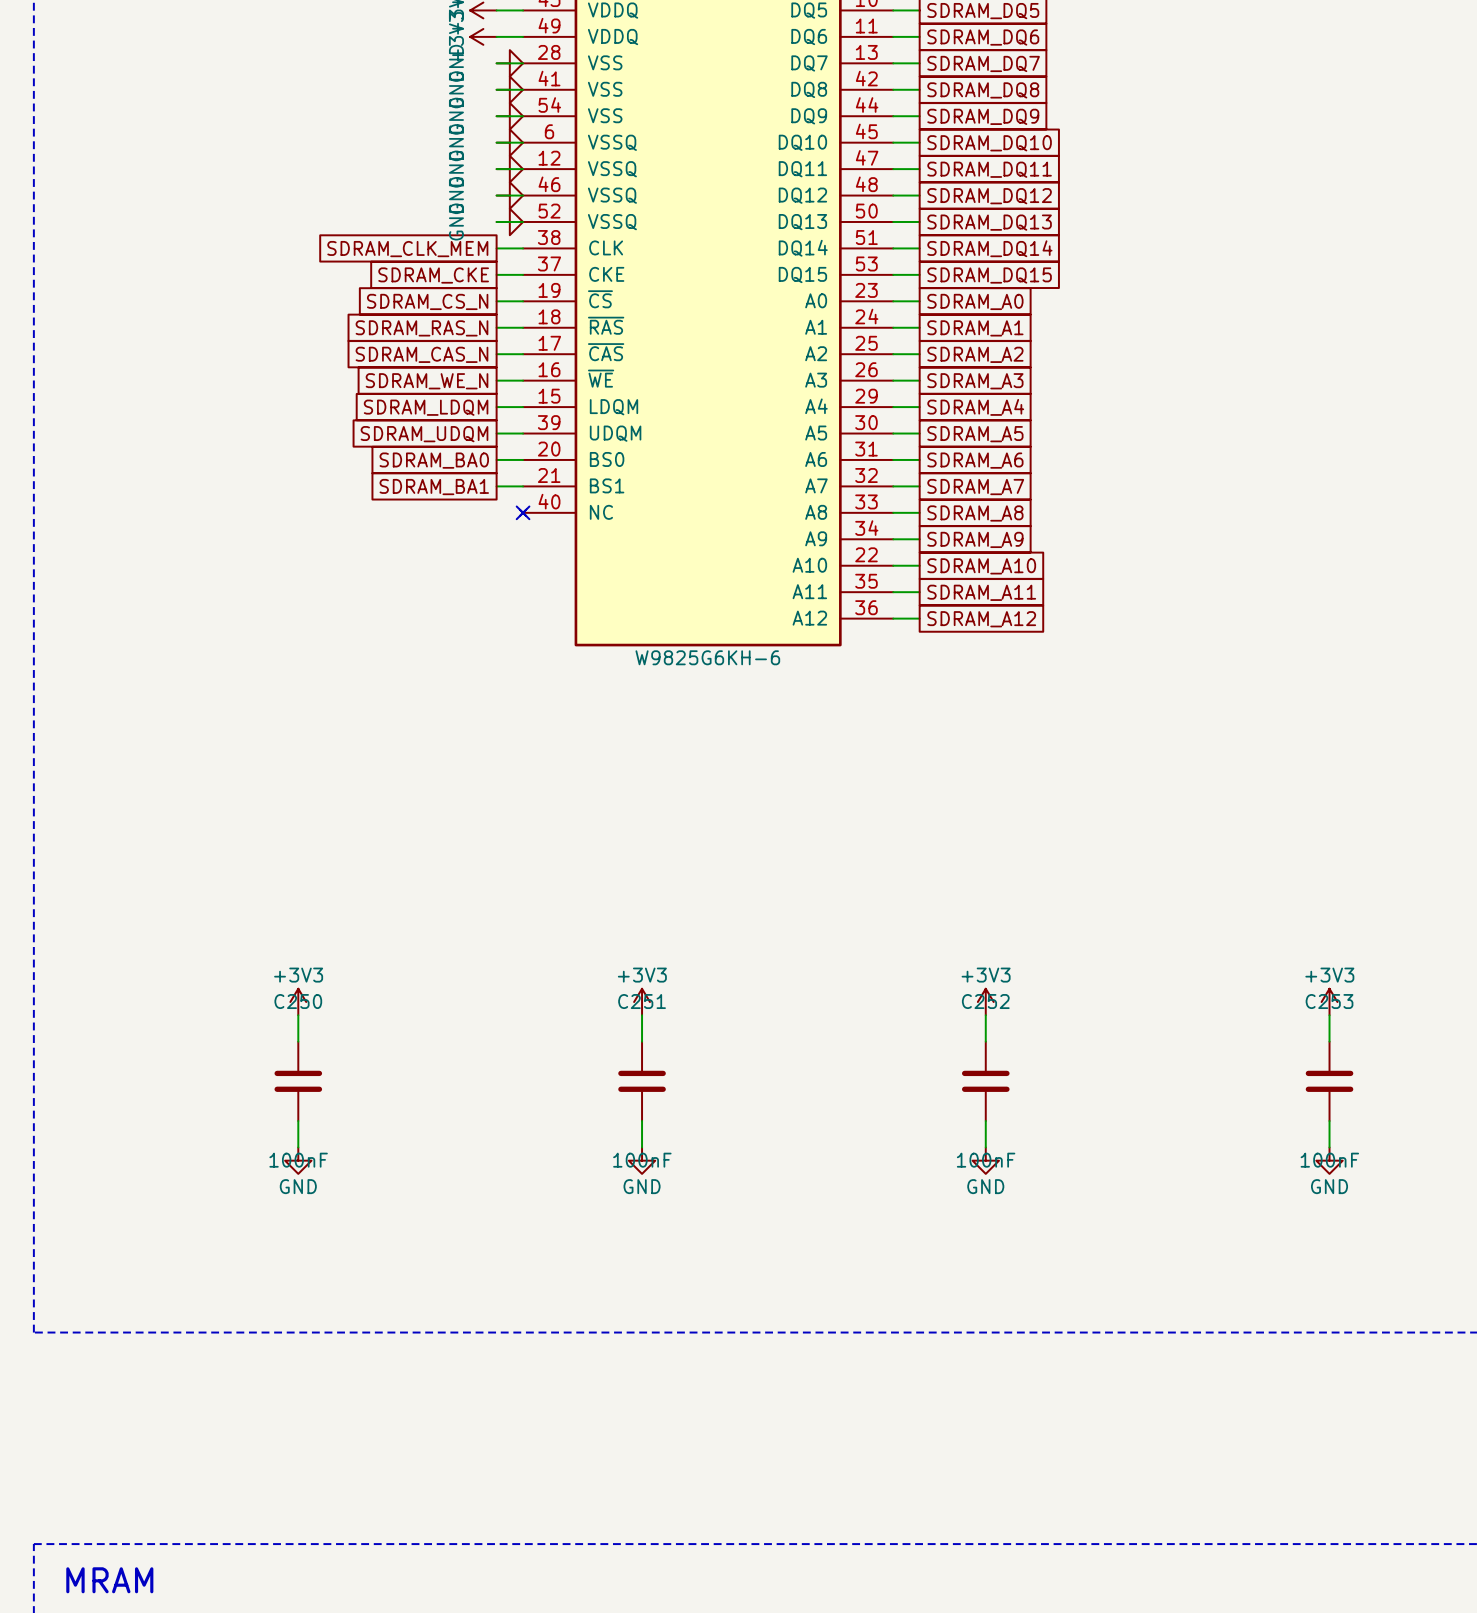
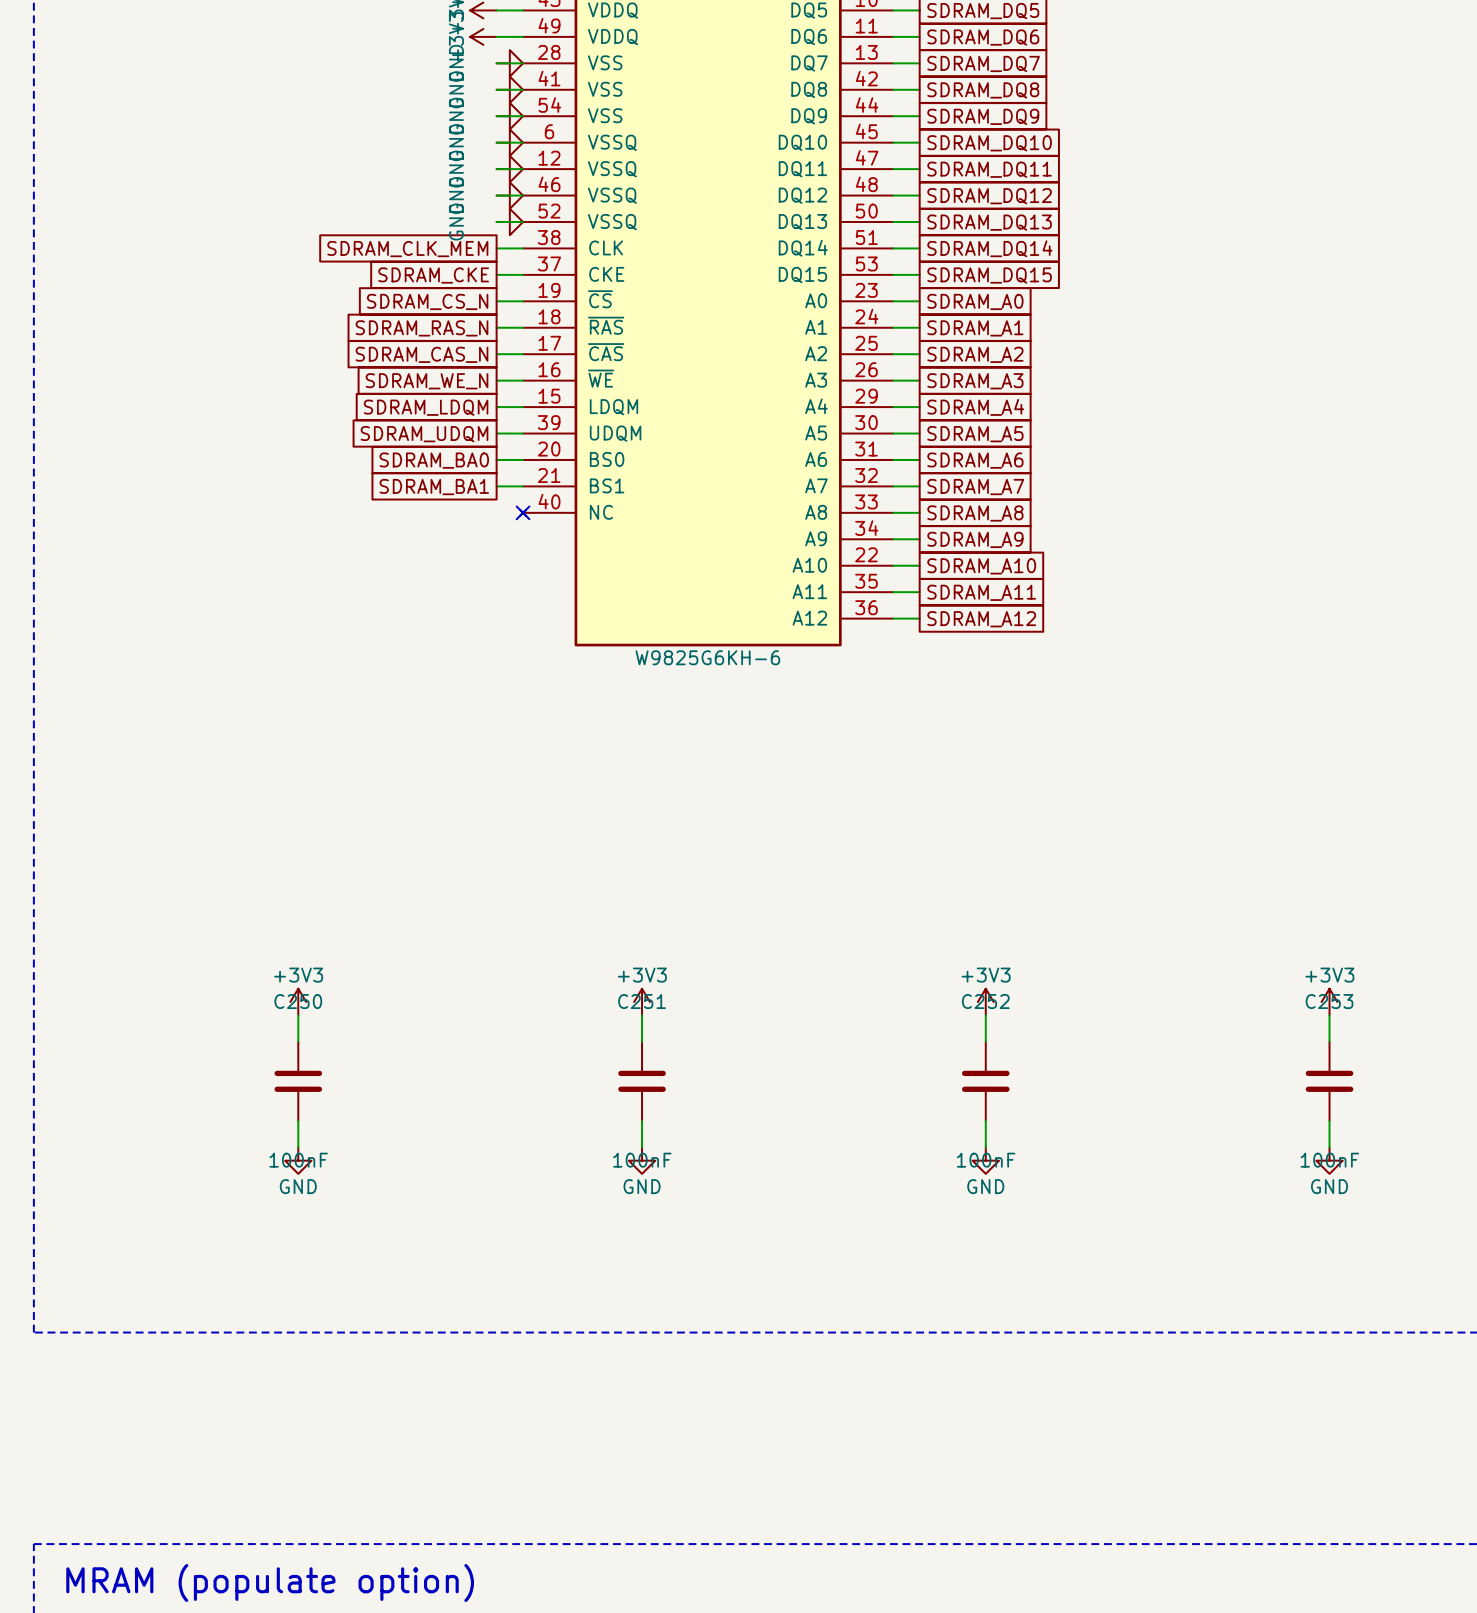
text: MRAM (109, 1580) -> MRAM (populate option) (270, 1583)

